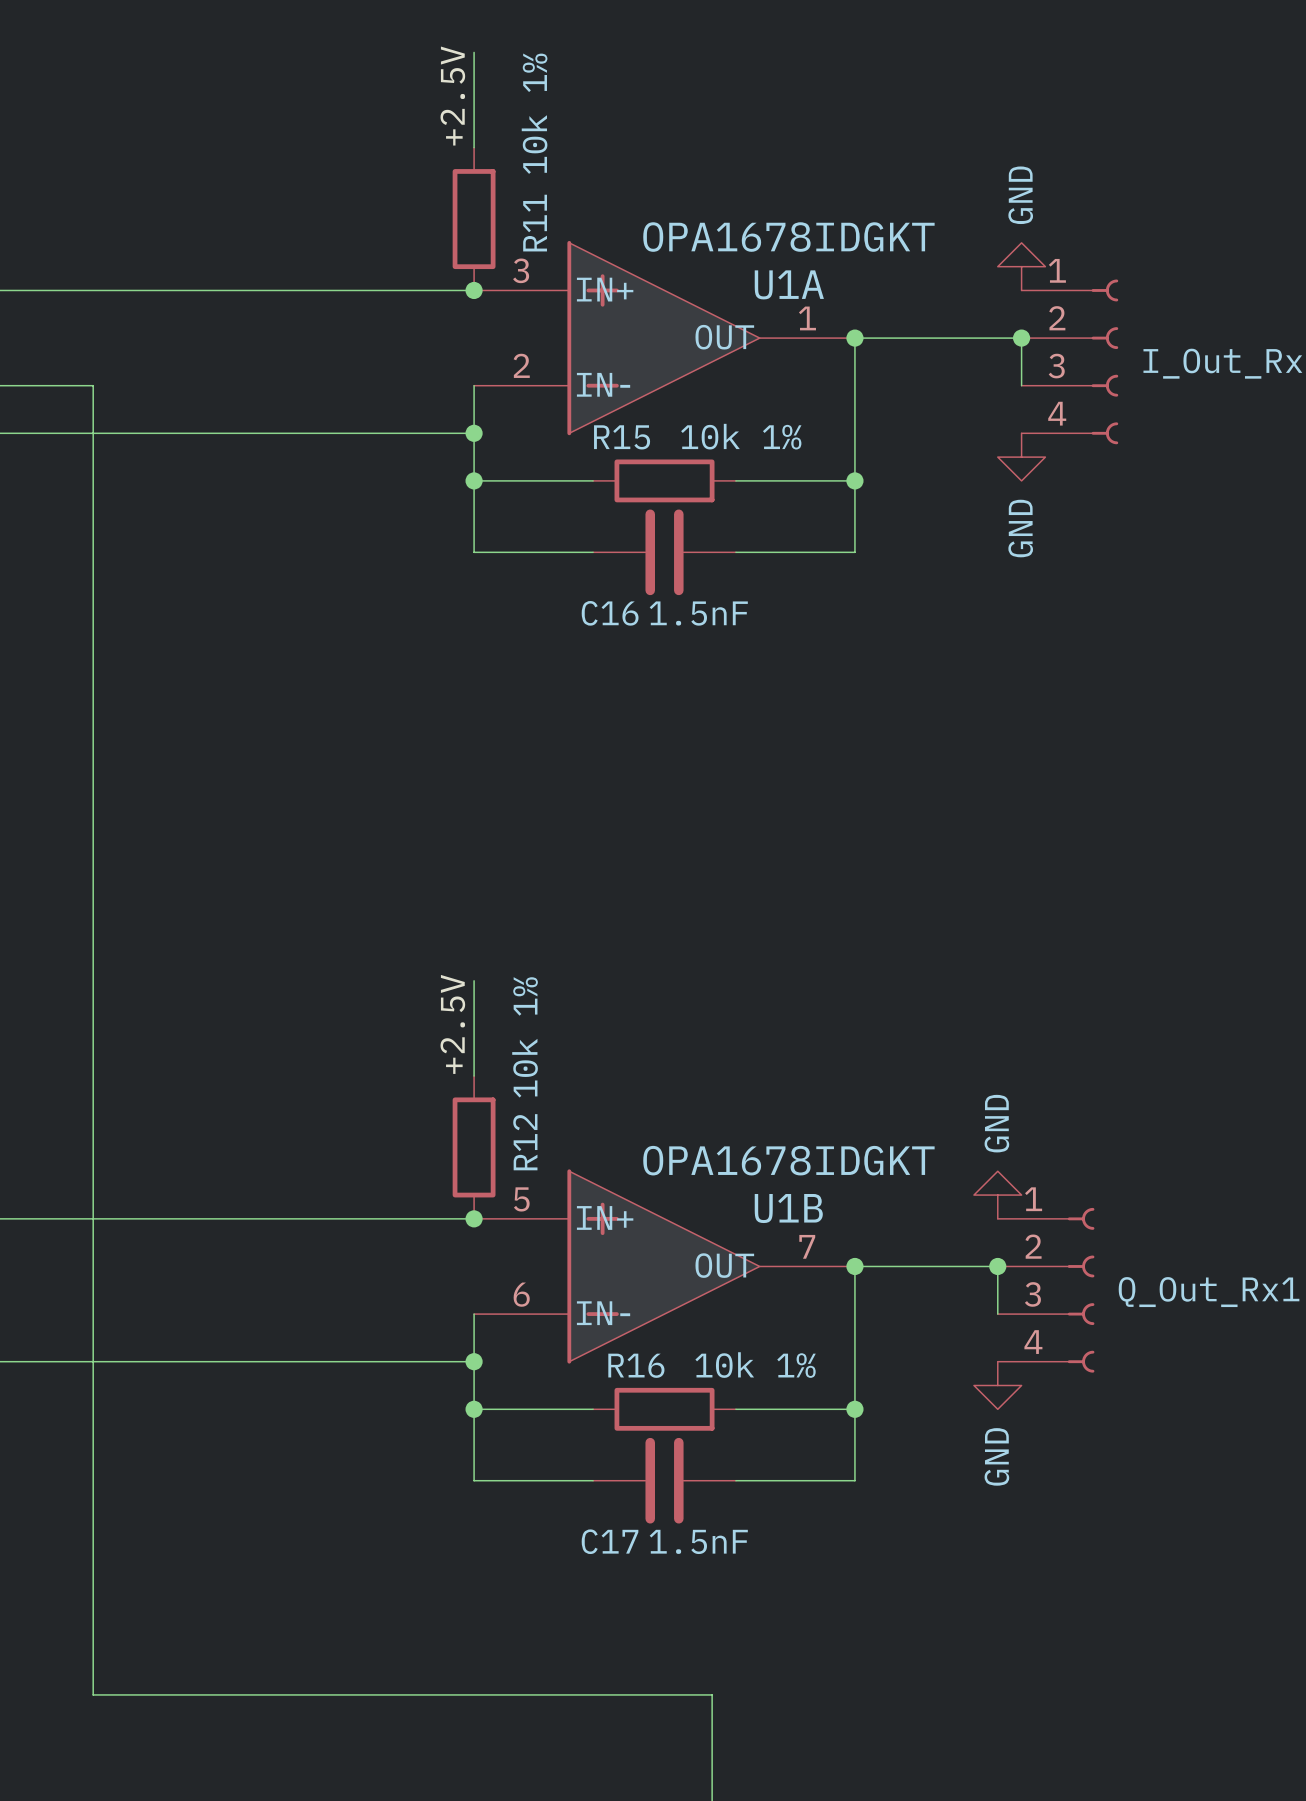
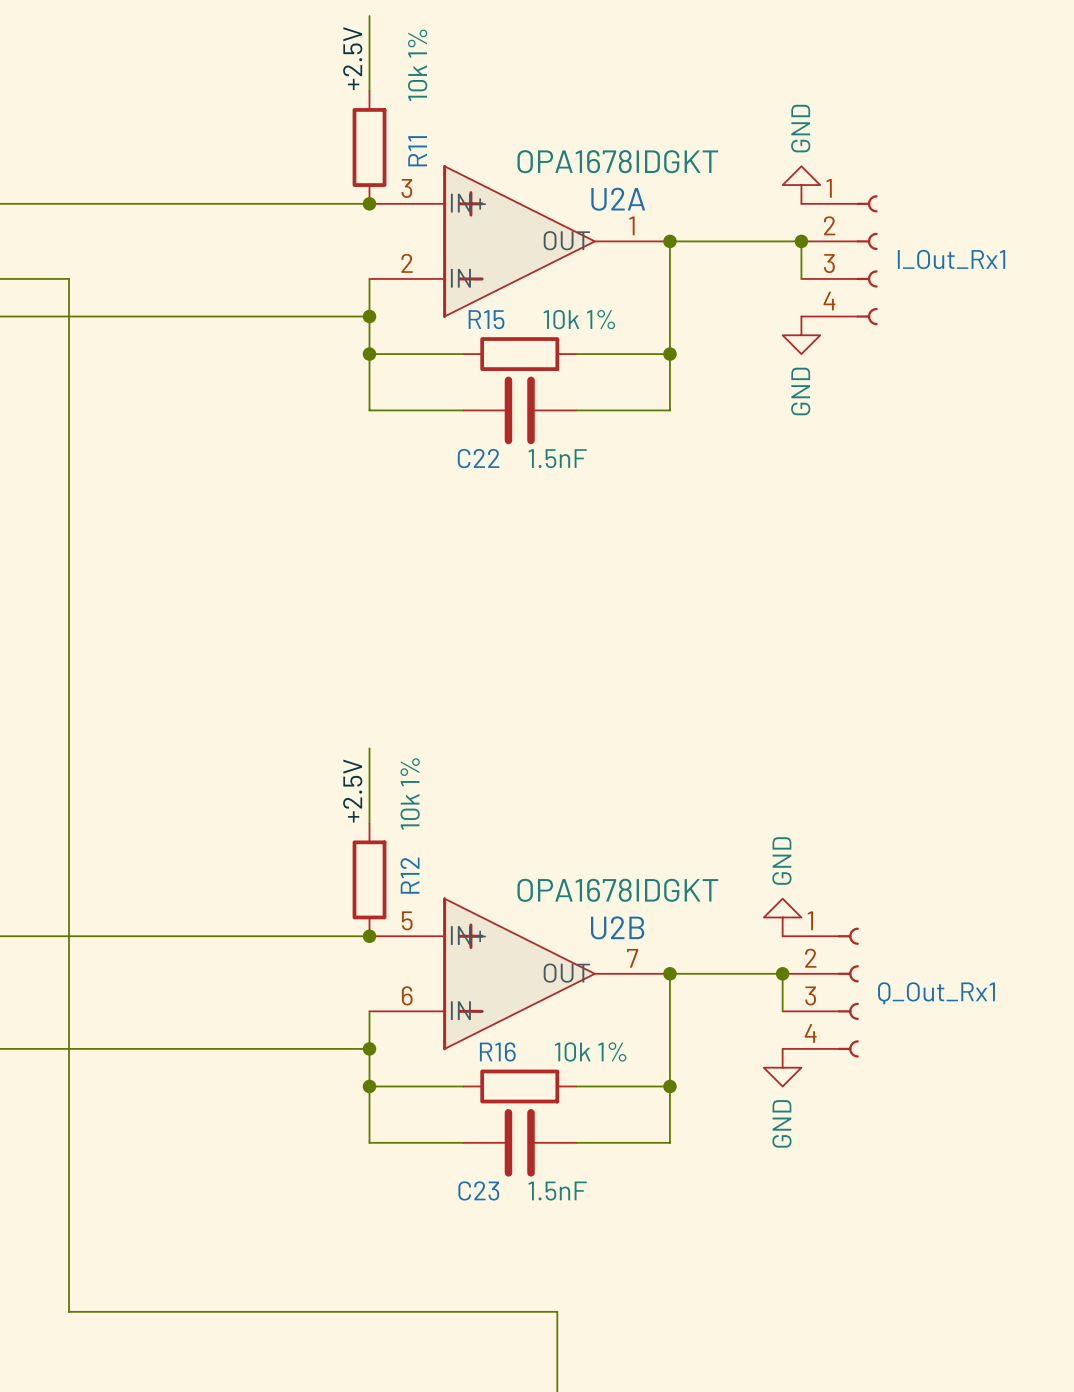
U1A name: U1A (789, 284) -> U2A (618, 199)
C16 name: C16 (610, 613) -> C22 (478, 458)
U1B name: U1B (788, 1208) -> U2B (617, 927)
C17 name: C17 (610, 1541) -> C23 (478, 1190)

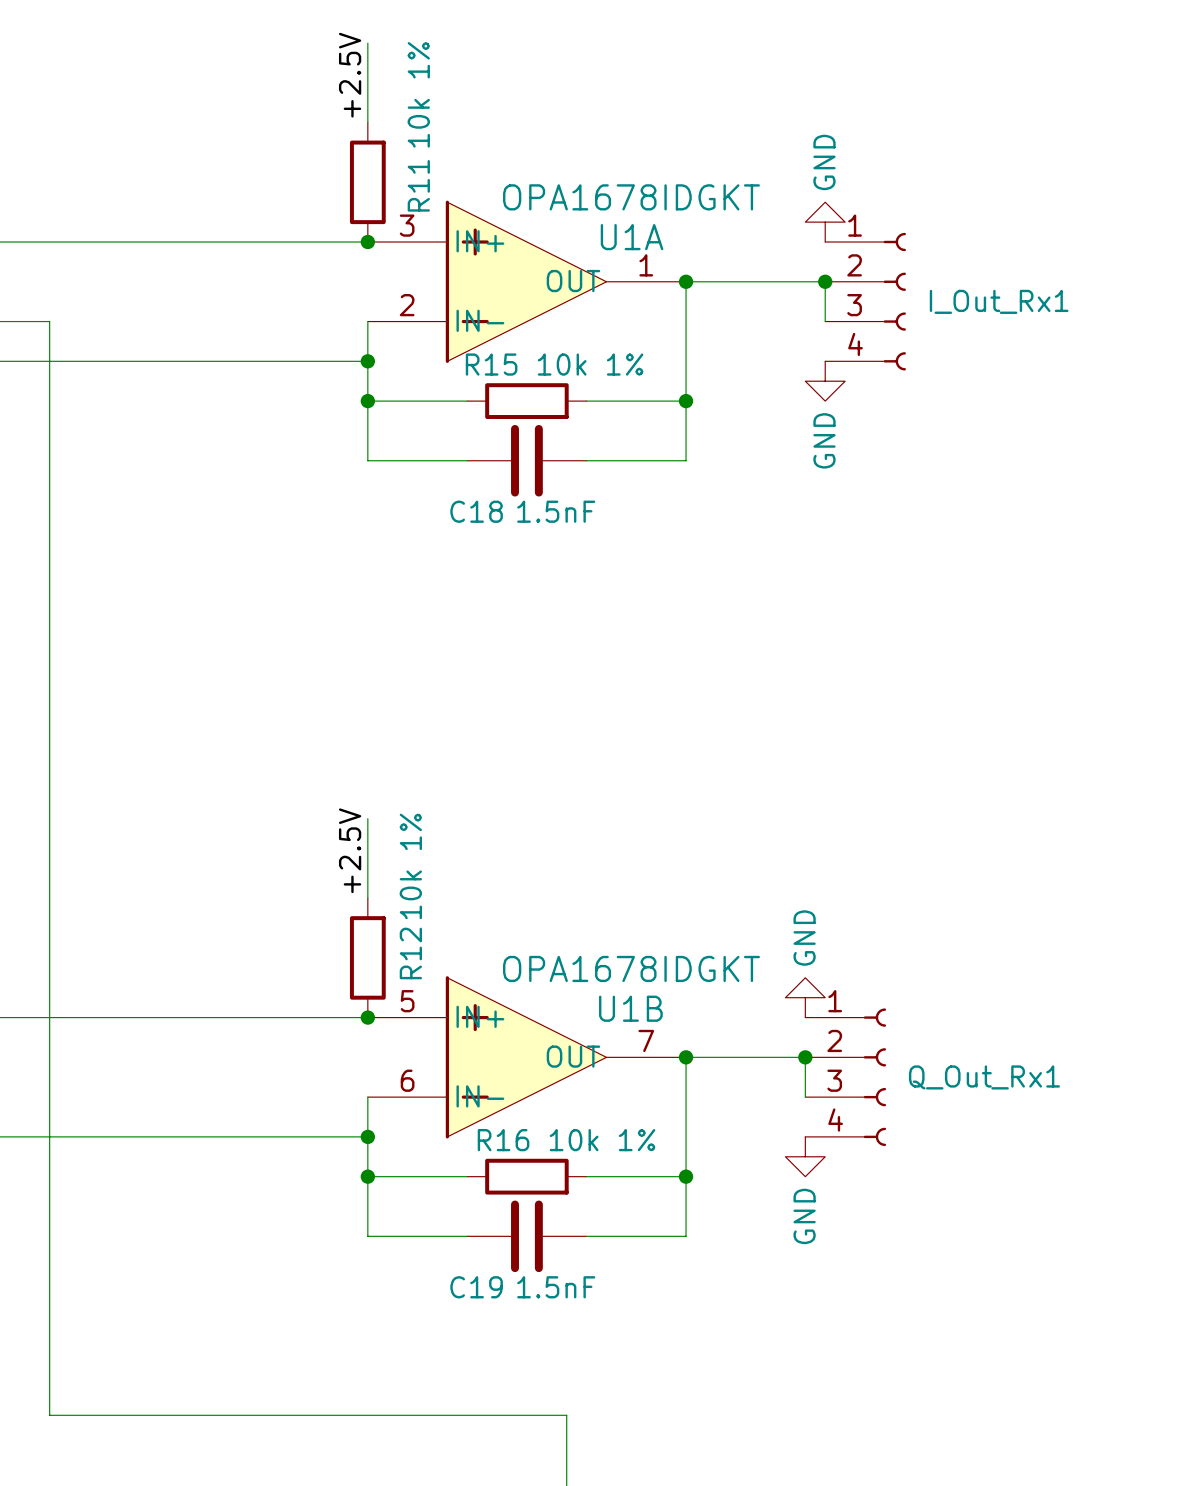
U2A name: U2A (618, 199) -> U1A (632, 237)
C22 name: C22 (478, 458) -> C18 (476, 511)
U2B name: U2B (617, 927) -> U1B (630, 1008)
C23 name: C23 (478, 1190) -> C19 (476, 1287)

